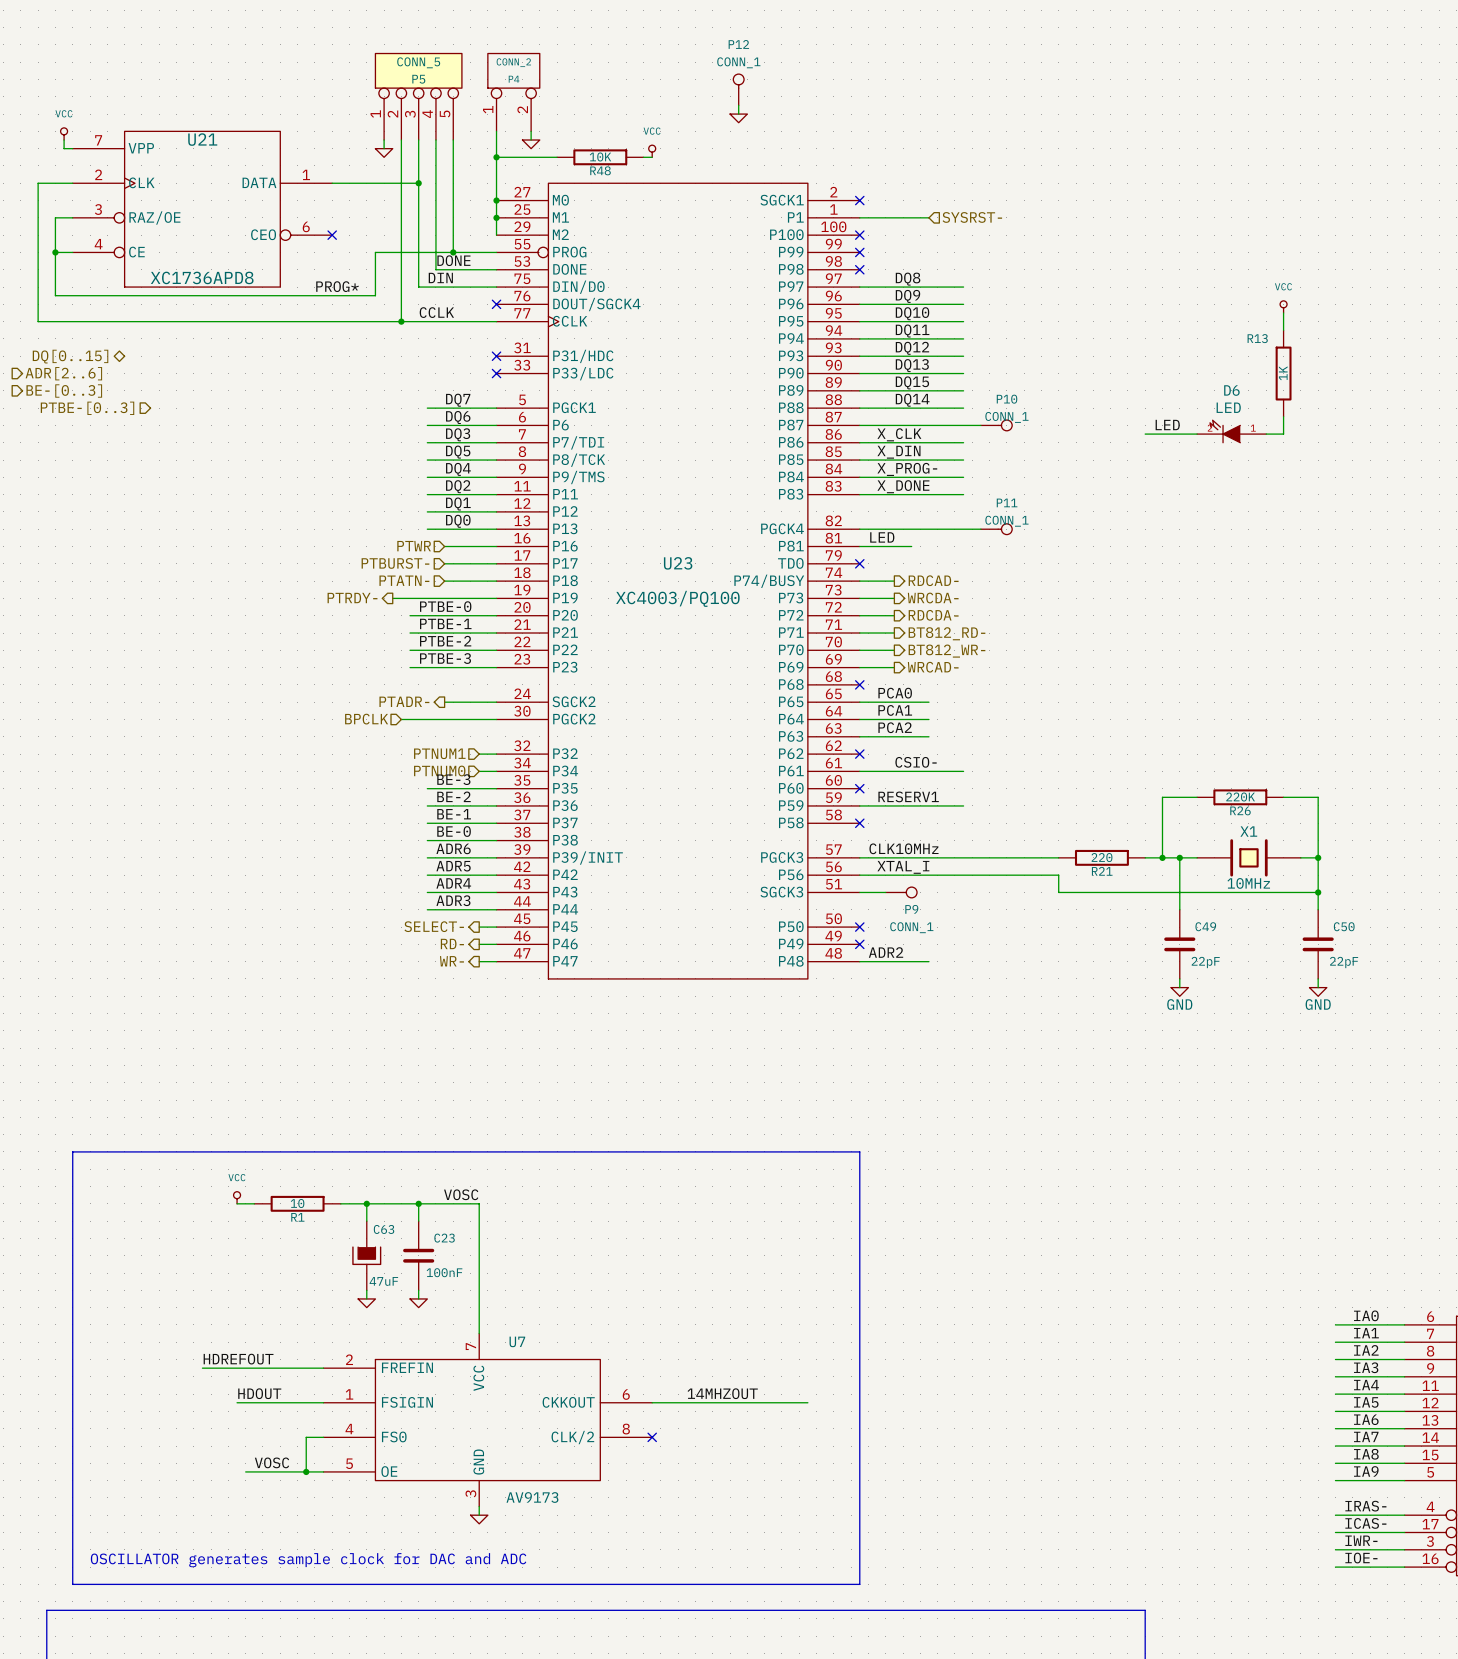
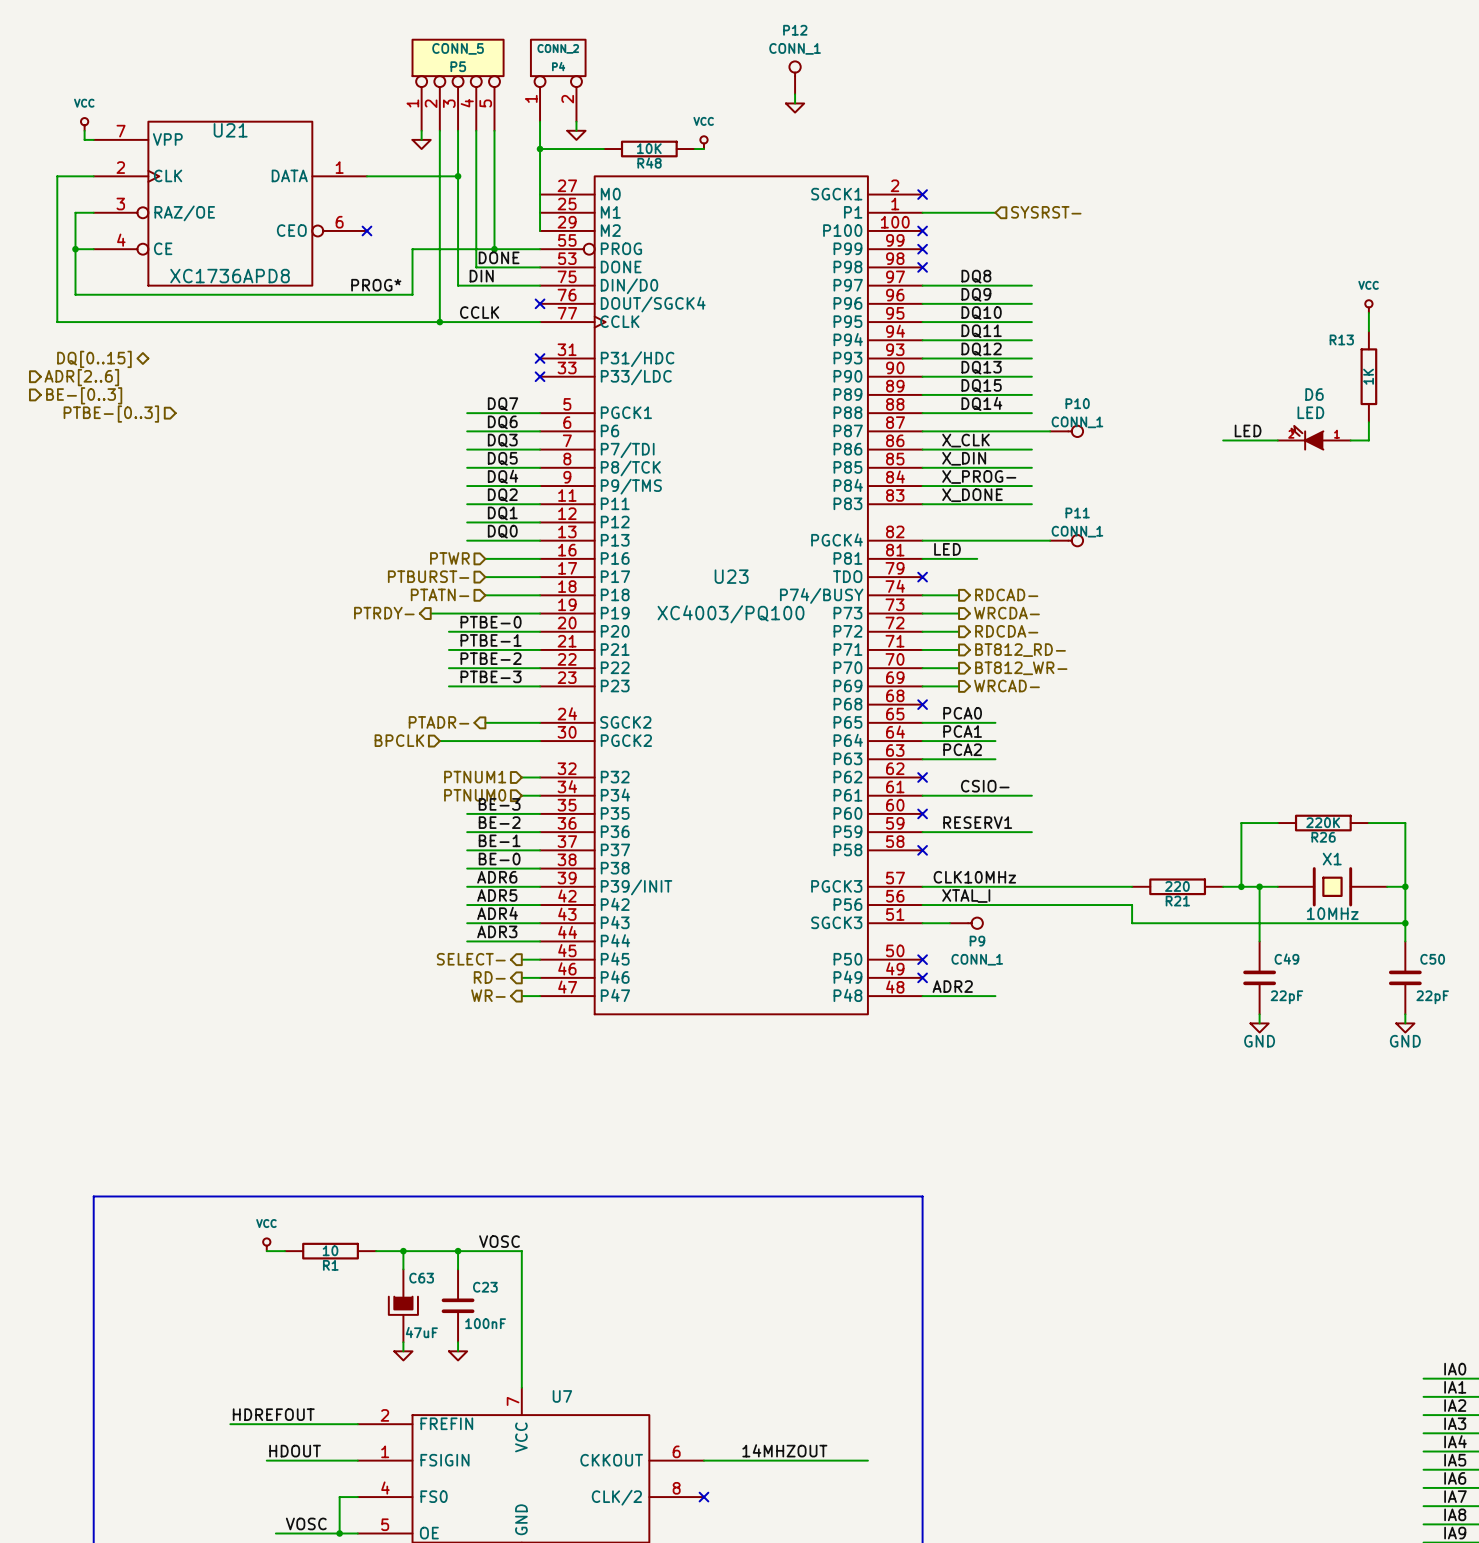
junction: (496, 200) -> none
junction: (496, 217) -> none

